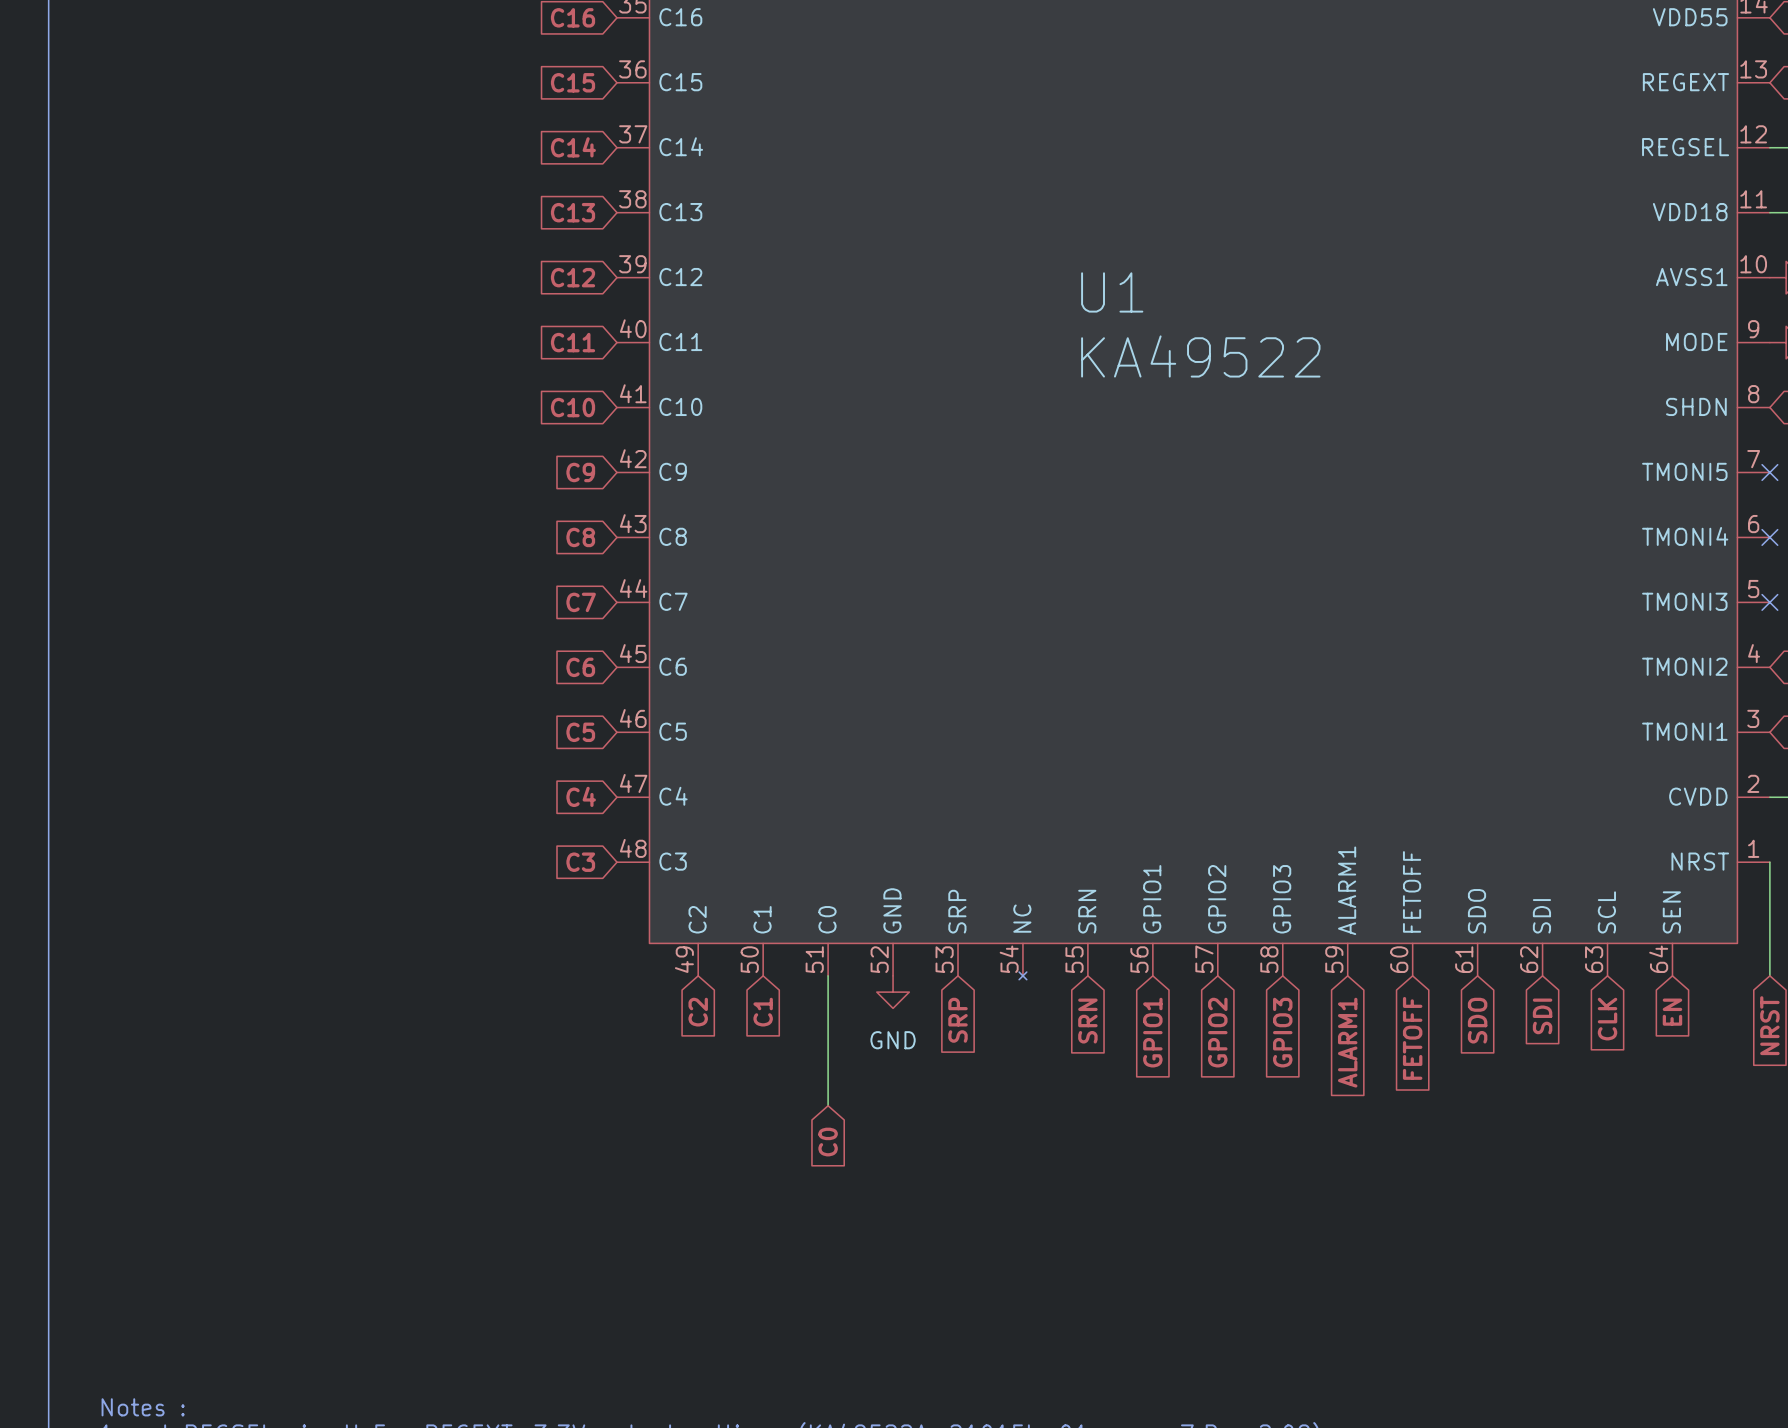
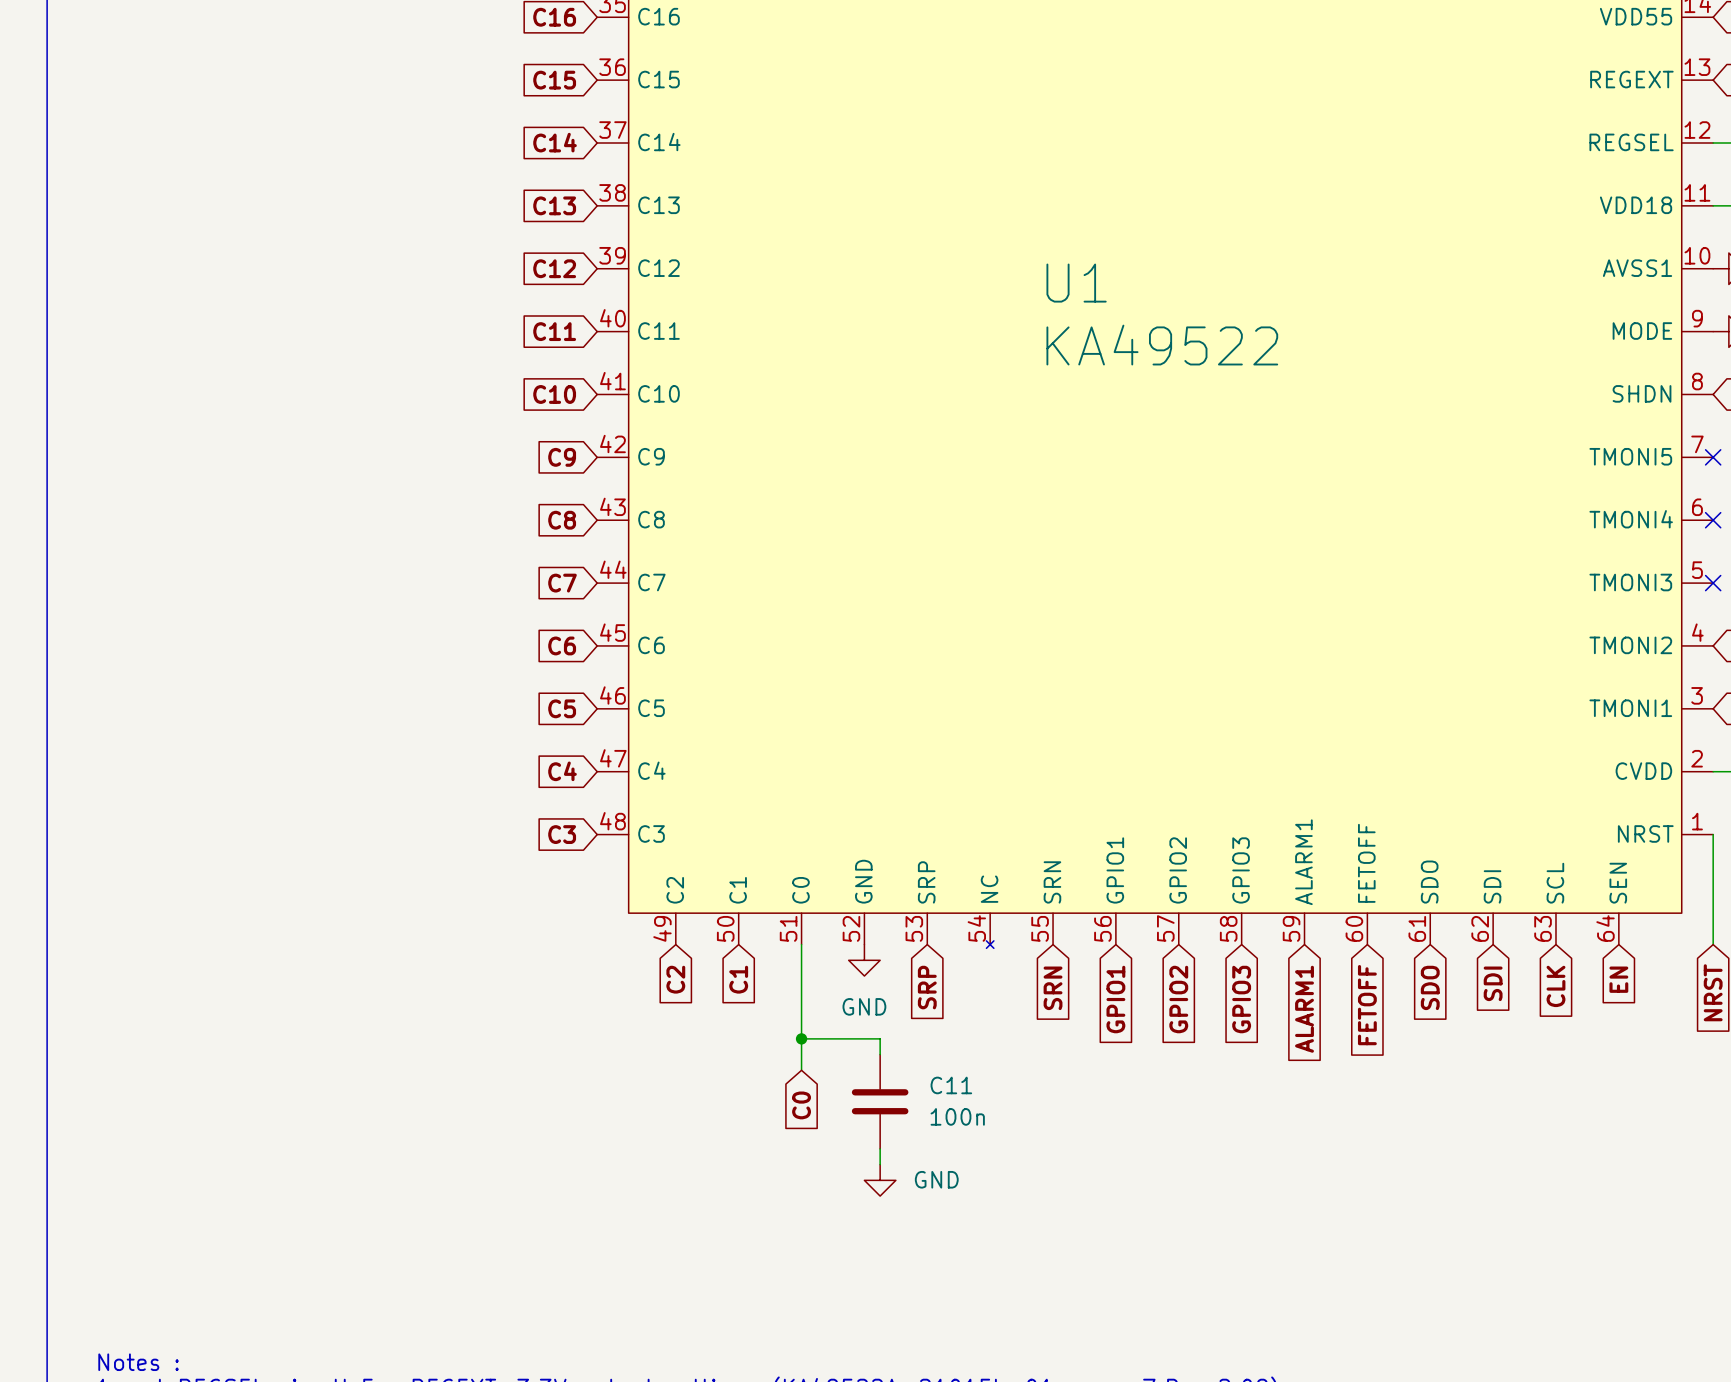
wire: none -> (801, 1038) (880, 1038) (880, 1054)
junction: none -> (801, 1038)
C11: none -> 100n (880, 1101)
wire: none -> (880, 1148) (880, 1164)
power symbol: none -> GND (880, 1180)

